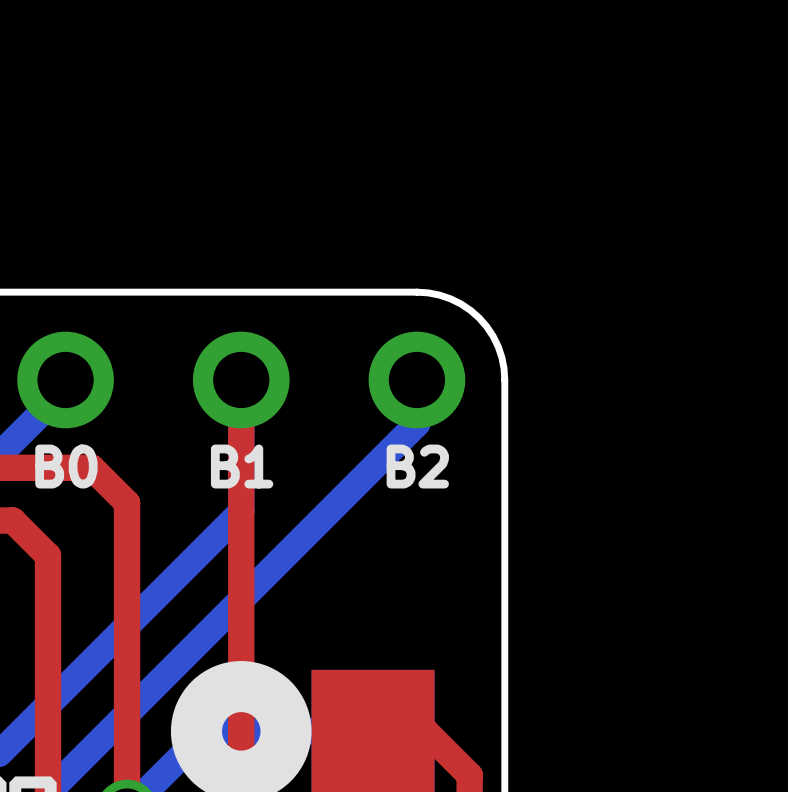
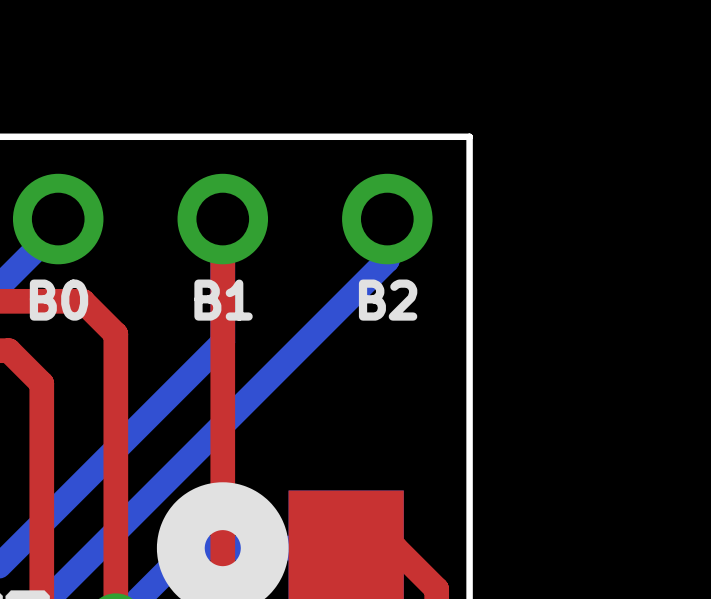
board edge: (416, 292) (450, 298) (479, 317) (498, 346) (504, 379) -> (387, 136) (469, 136) (469, 219)

